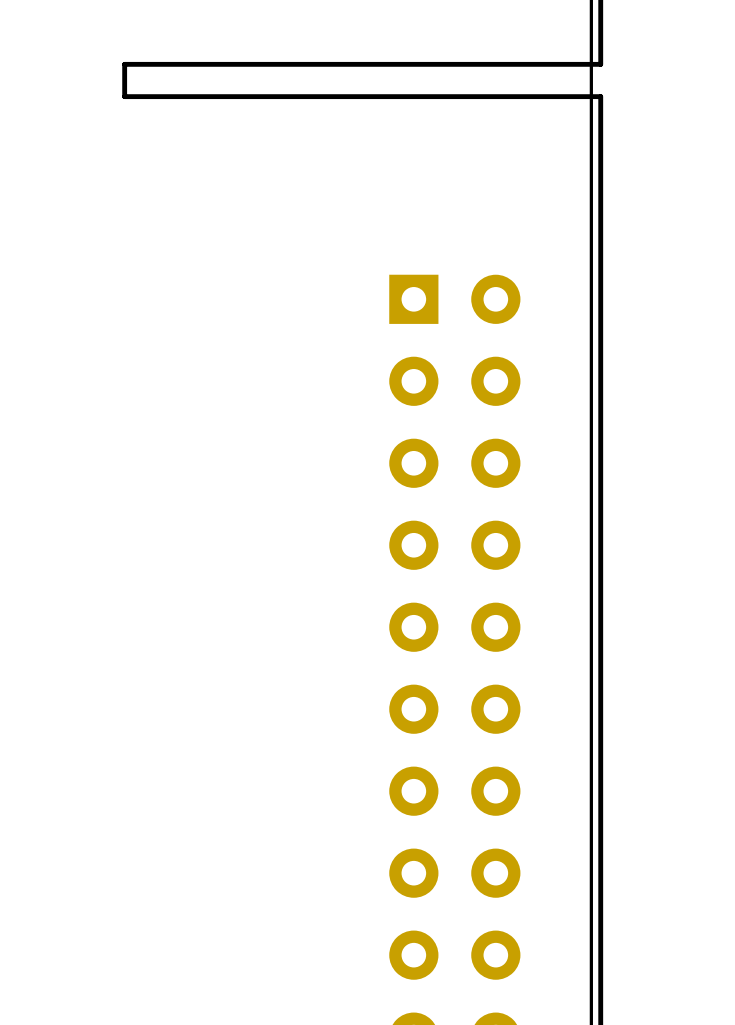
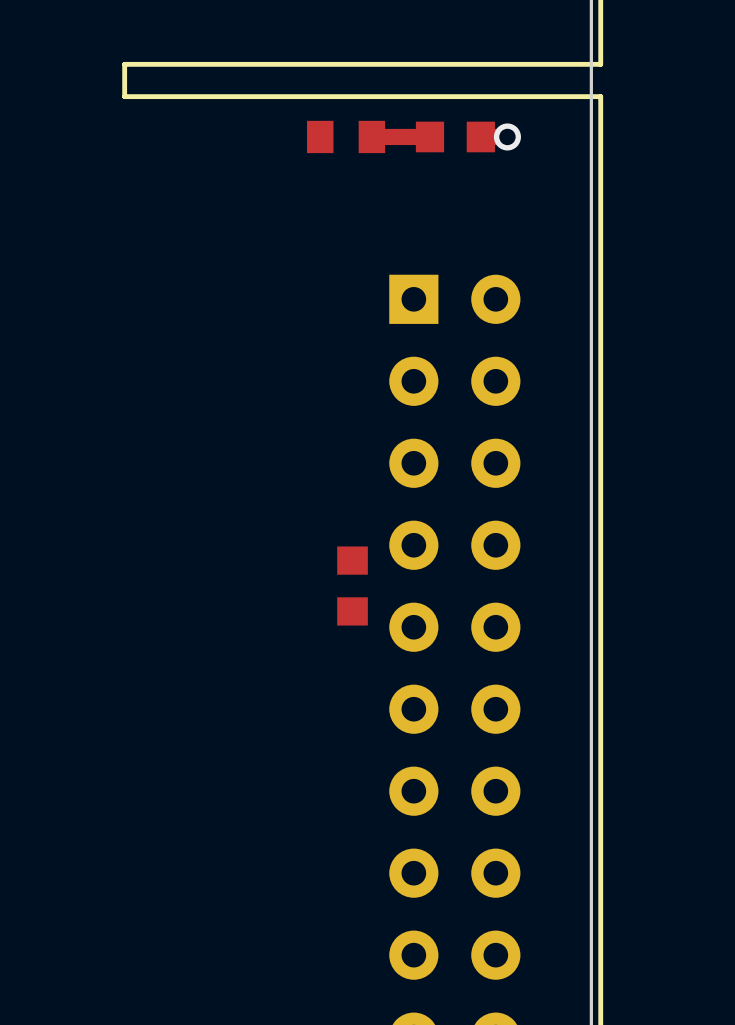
part: none -> (346, 136)
top track: none -> (429, 136) (371, 136)
part: none -> (455, 136)
via: none -> (507, 136)
part: none -> (352, 586)

